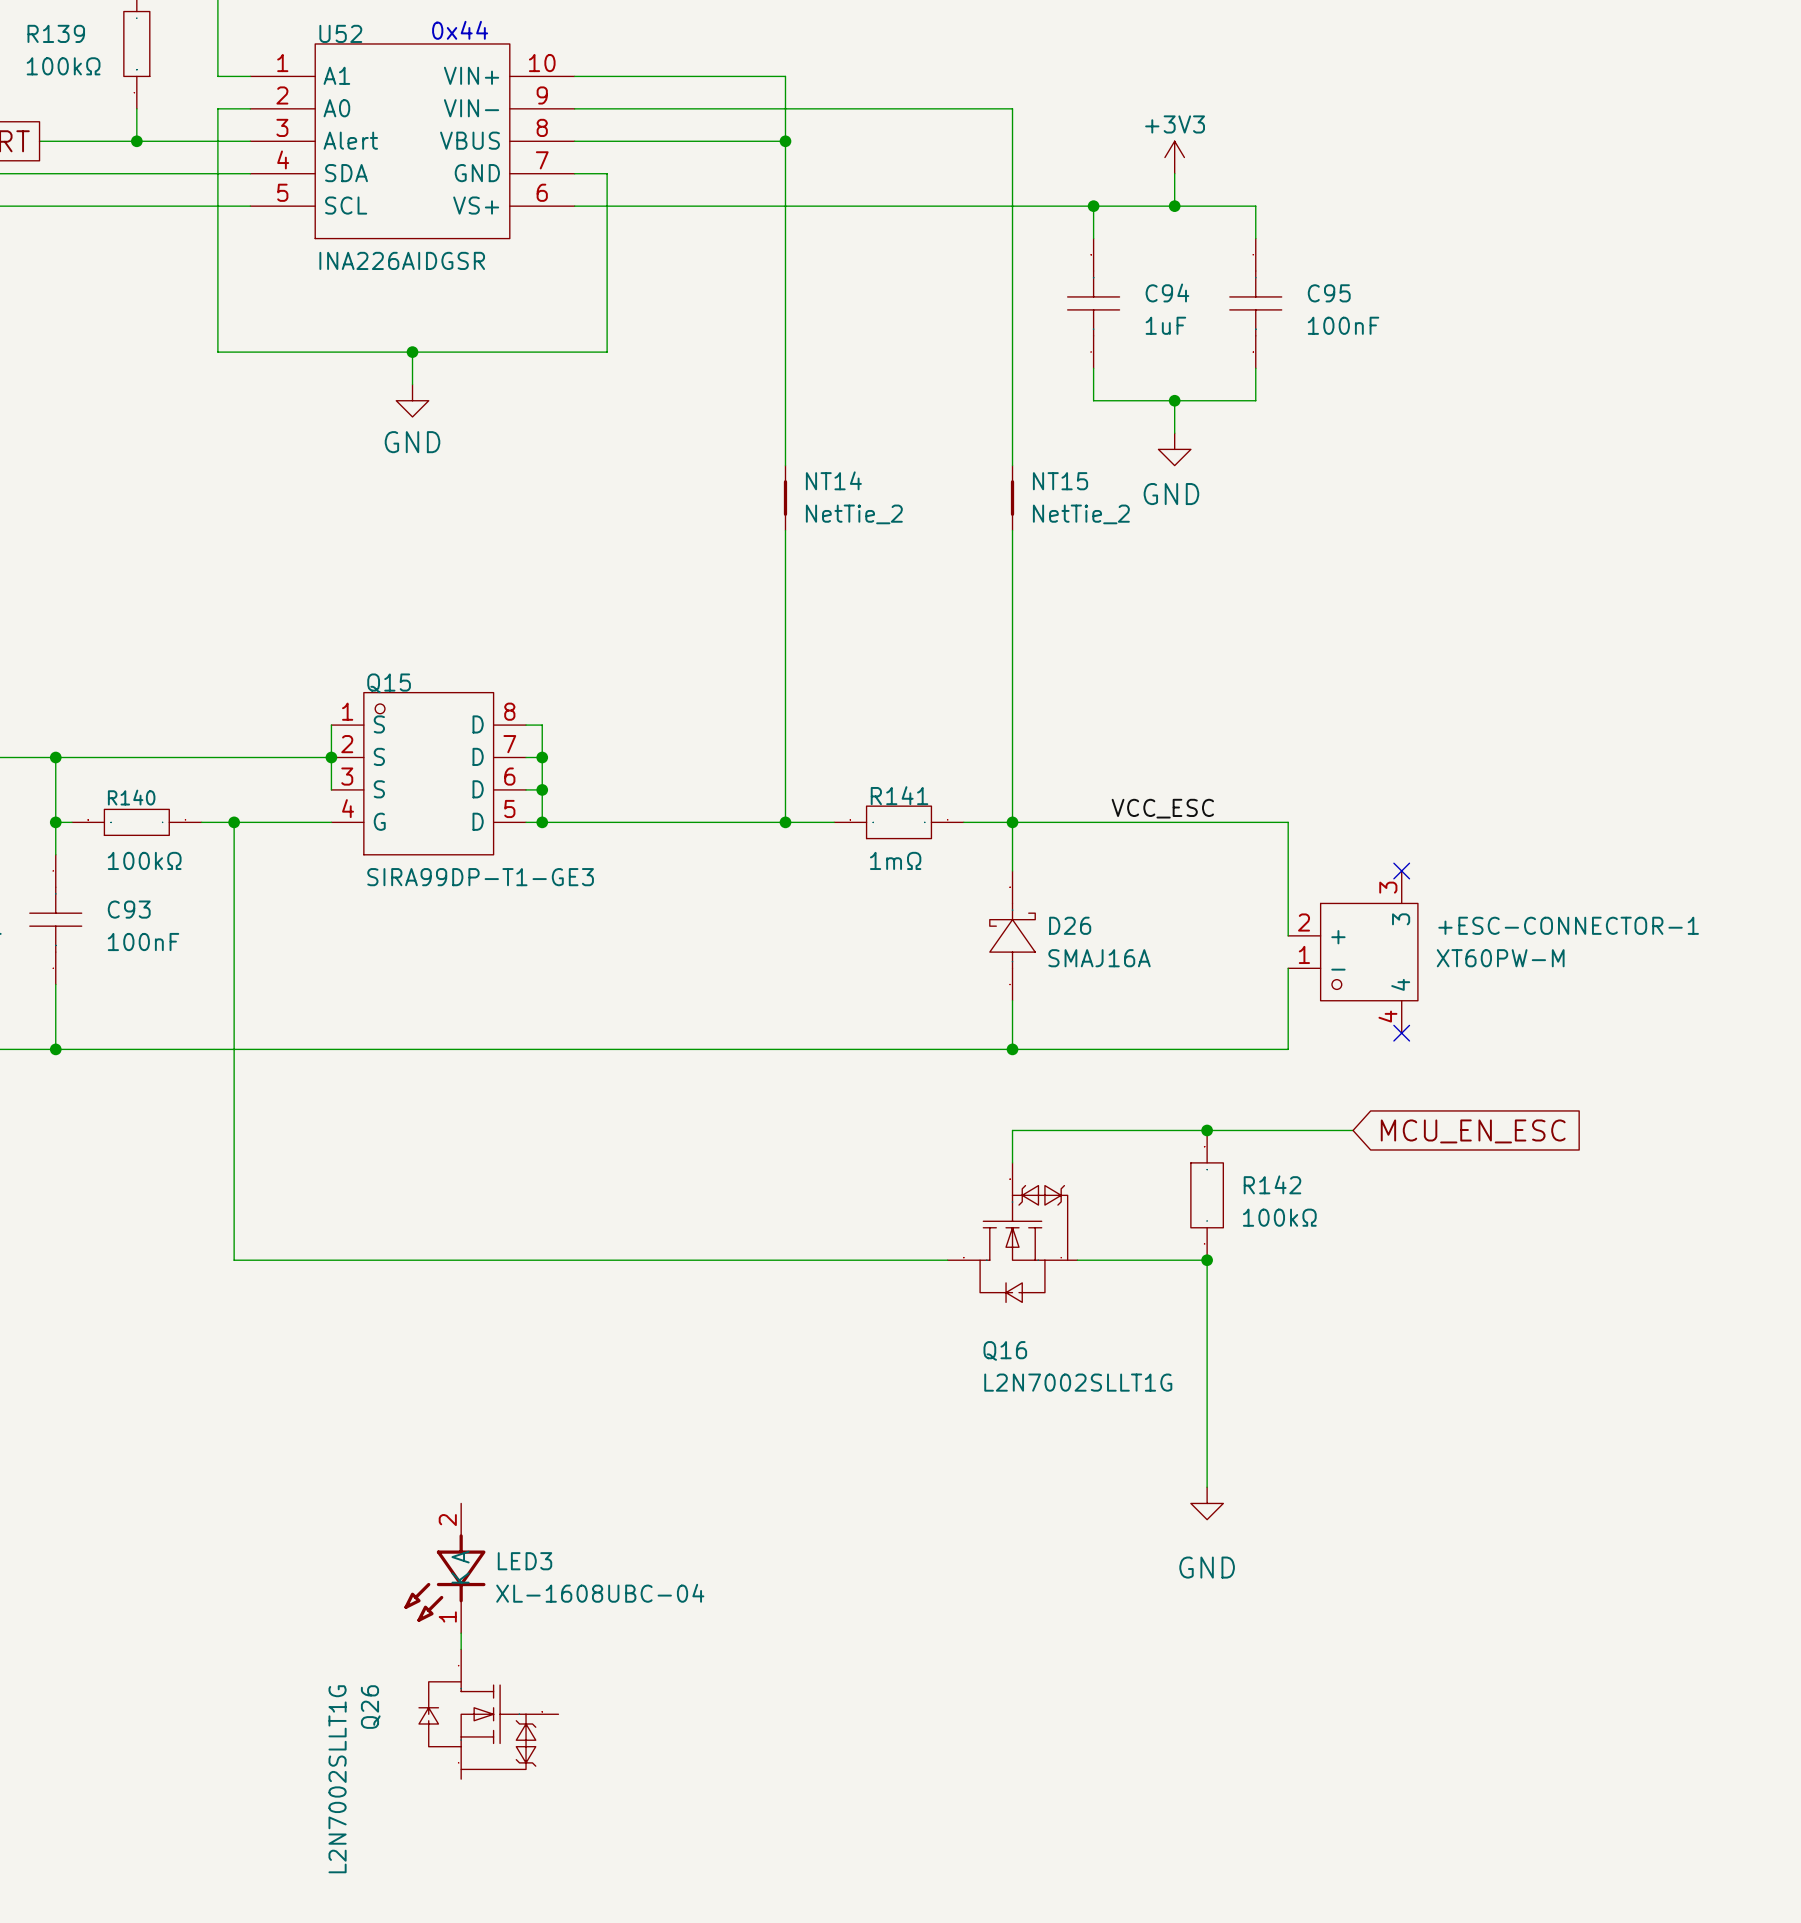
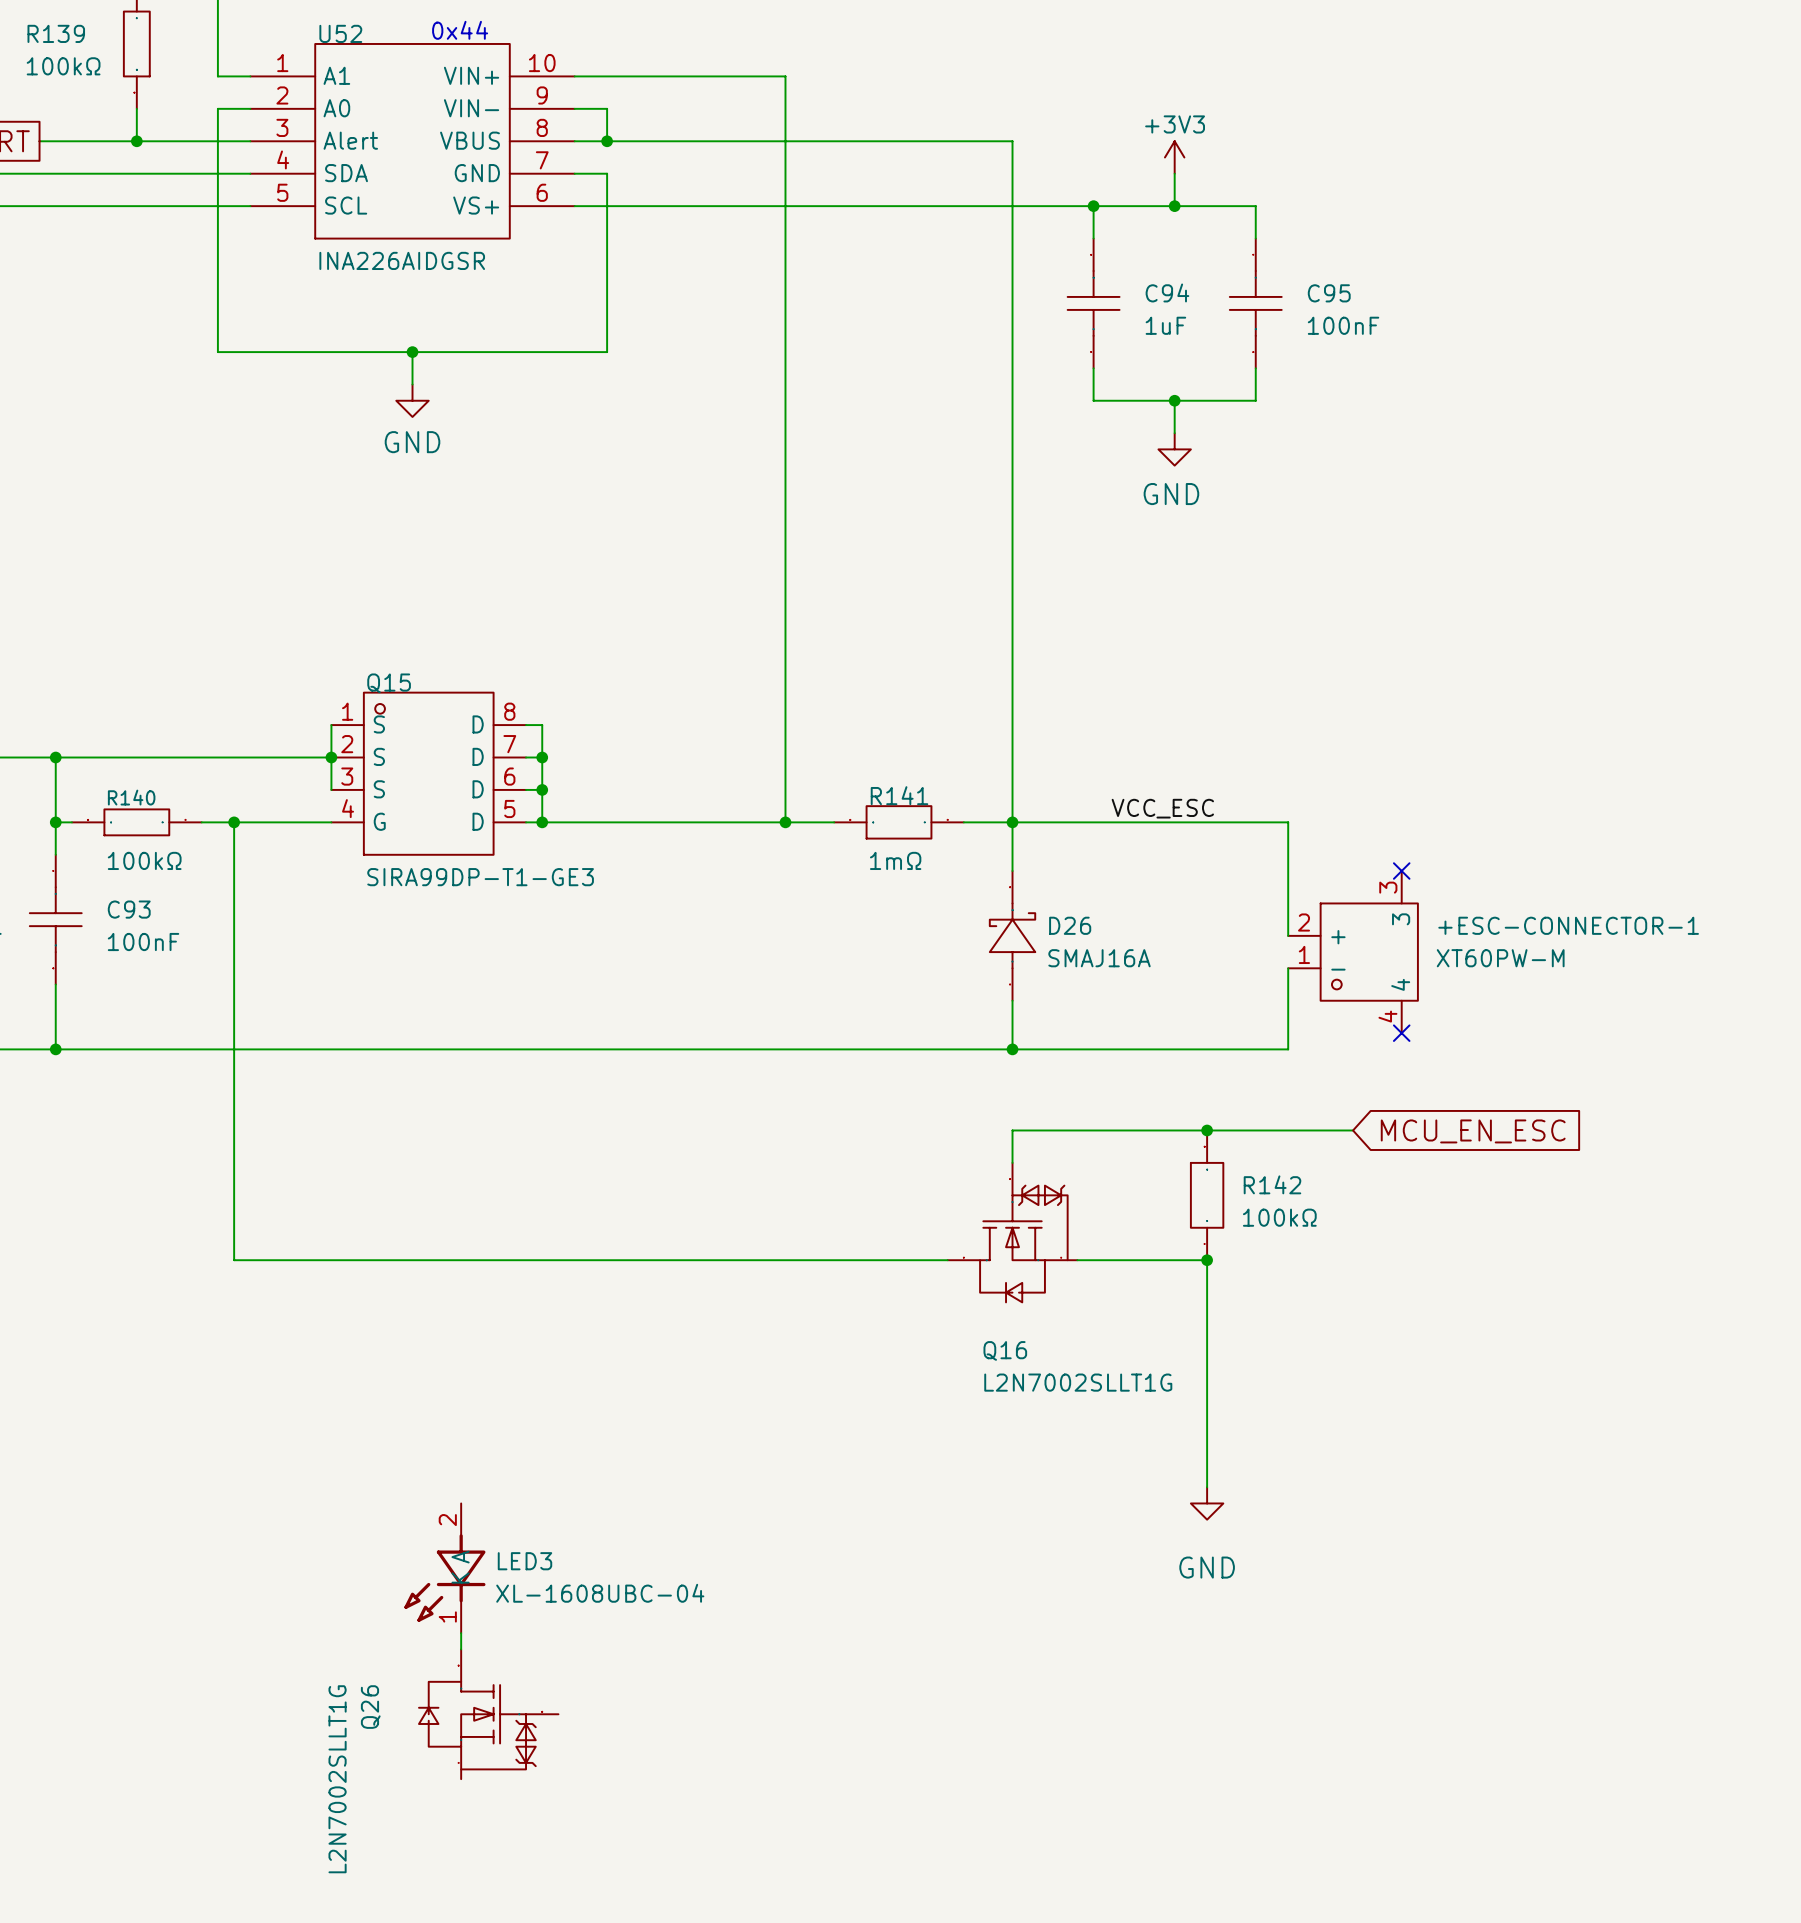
wire: (607, 108) (1012, 108) (1012, 141) -> (785, 141) (1012, 141)
wire: none -> (607, 108) (607, 141)
junction: none -> (607, 141)
junction: (785, 141) -> none
NT14: NetTie_2 (785, 498) -> none
NT15: NetTie_2 (1012, 498) -> none

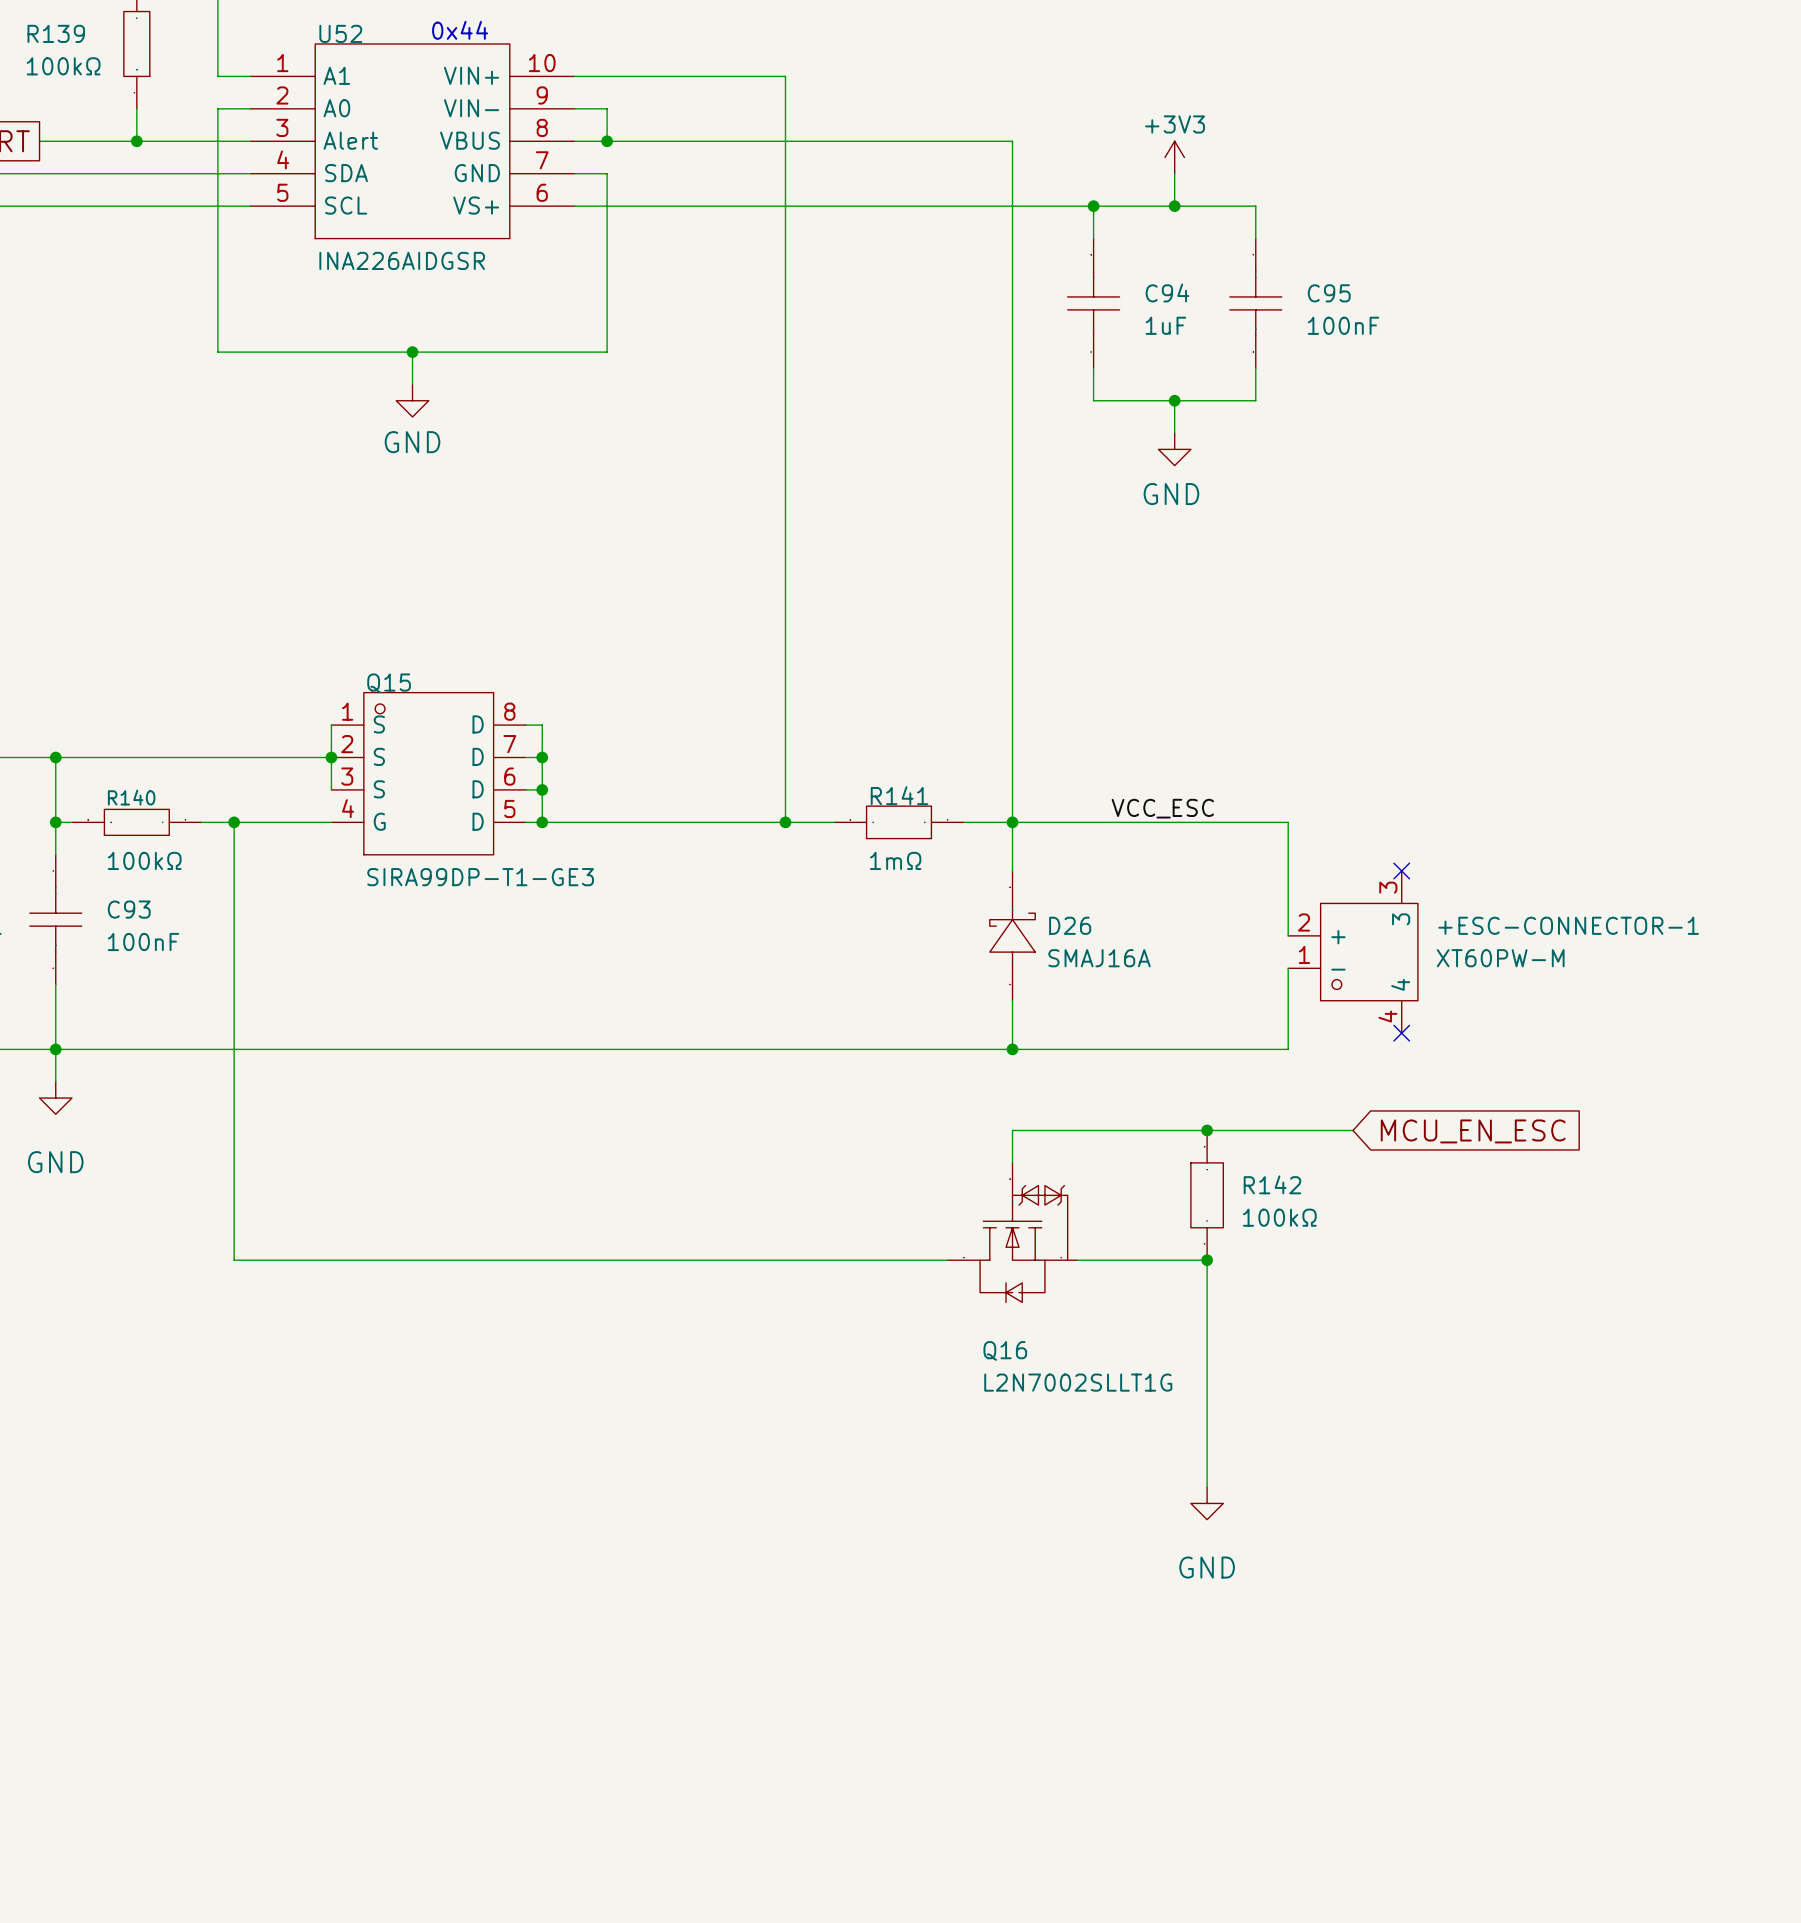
wire: none -> (55, 1049) (55, 1081)
power symbol: none -> GND (55, 1098)
LED3: XL-1608UBC-04 (444, 1568) -> none
wire: (461, 1633) (461, 1649) -> none
Q26: L2N7002SLLT1G (488, 1714) -> none

